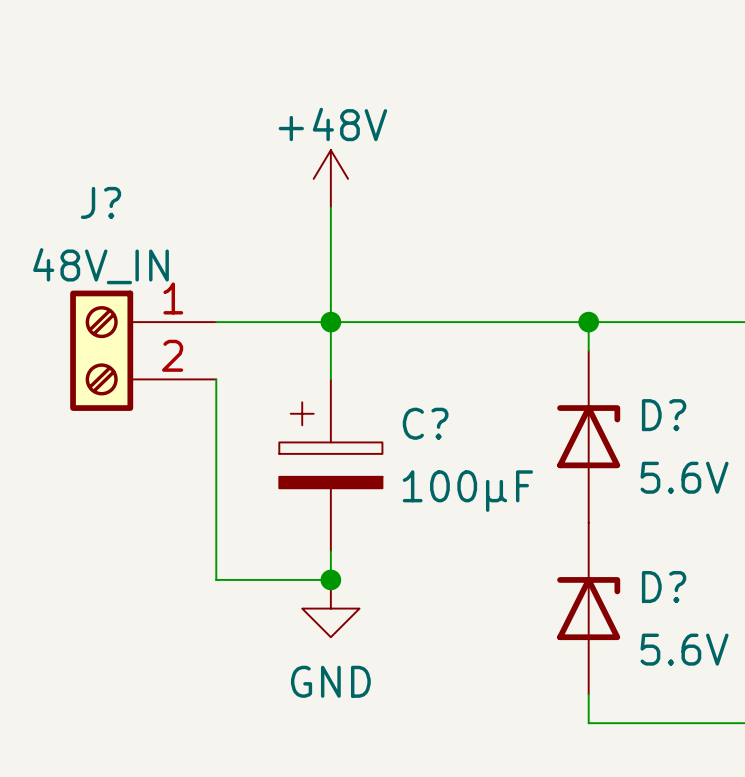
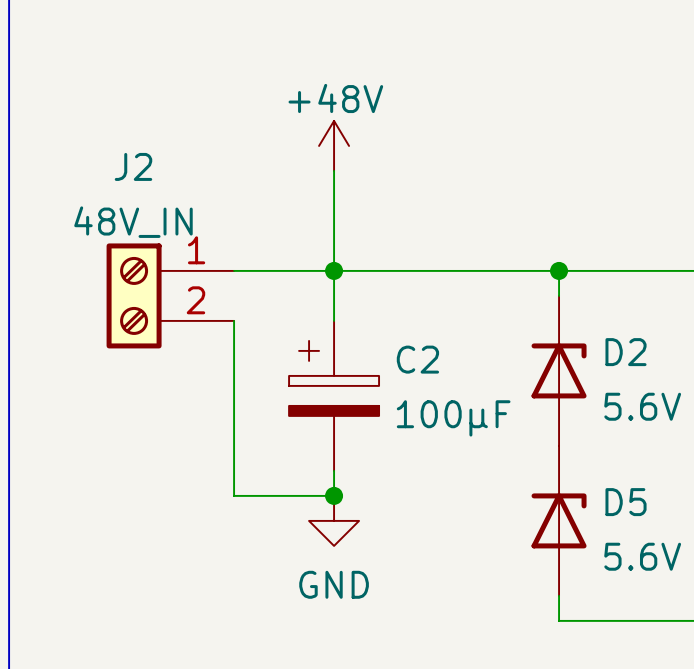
J? name: J? (101, 202) -> J2 (133, 166)
D? name: D? (664, 415) -> D2 (626, 352)
C? name: C? (425, 423) -> C2 (417, 359)
D? name: D? (664, 587) -> D5 (626, 502)

